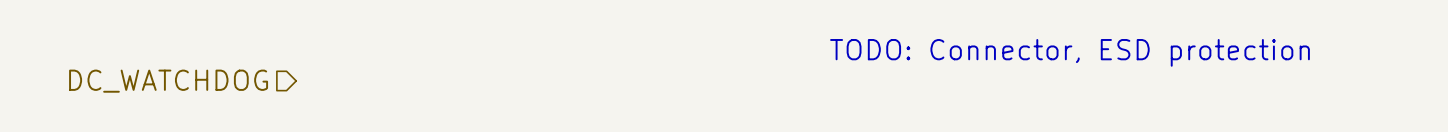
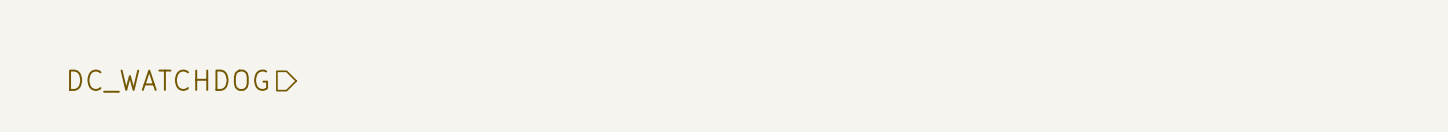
text: TODO: Connector, ESD protection (1069, 52) -> none

